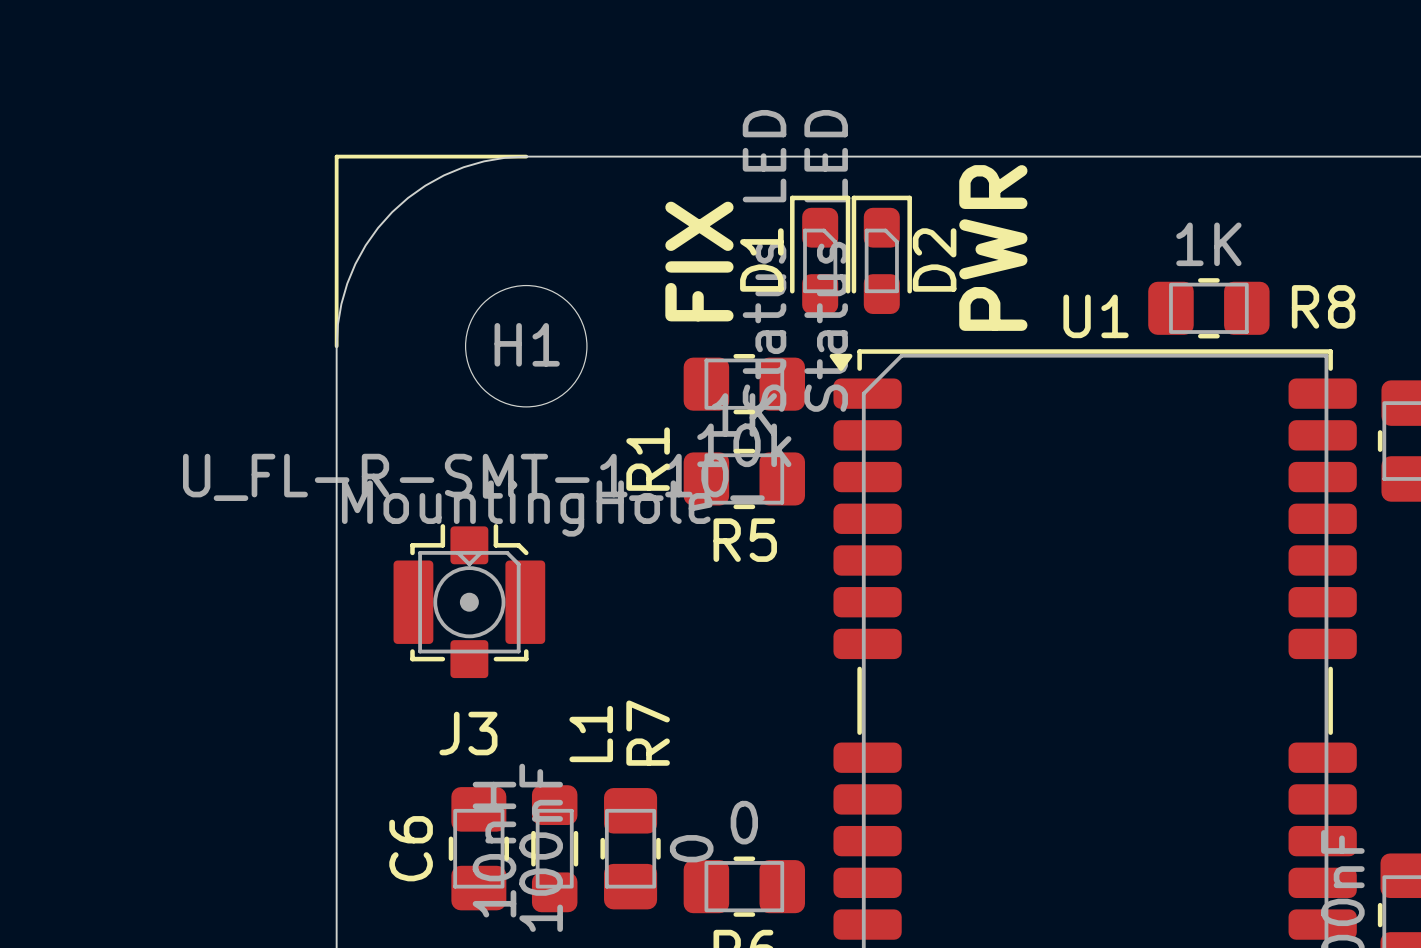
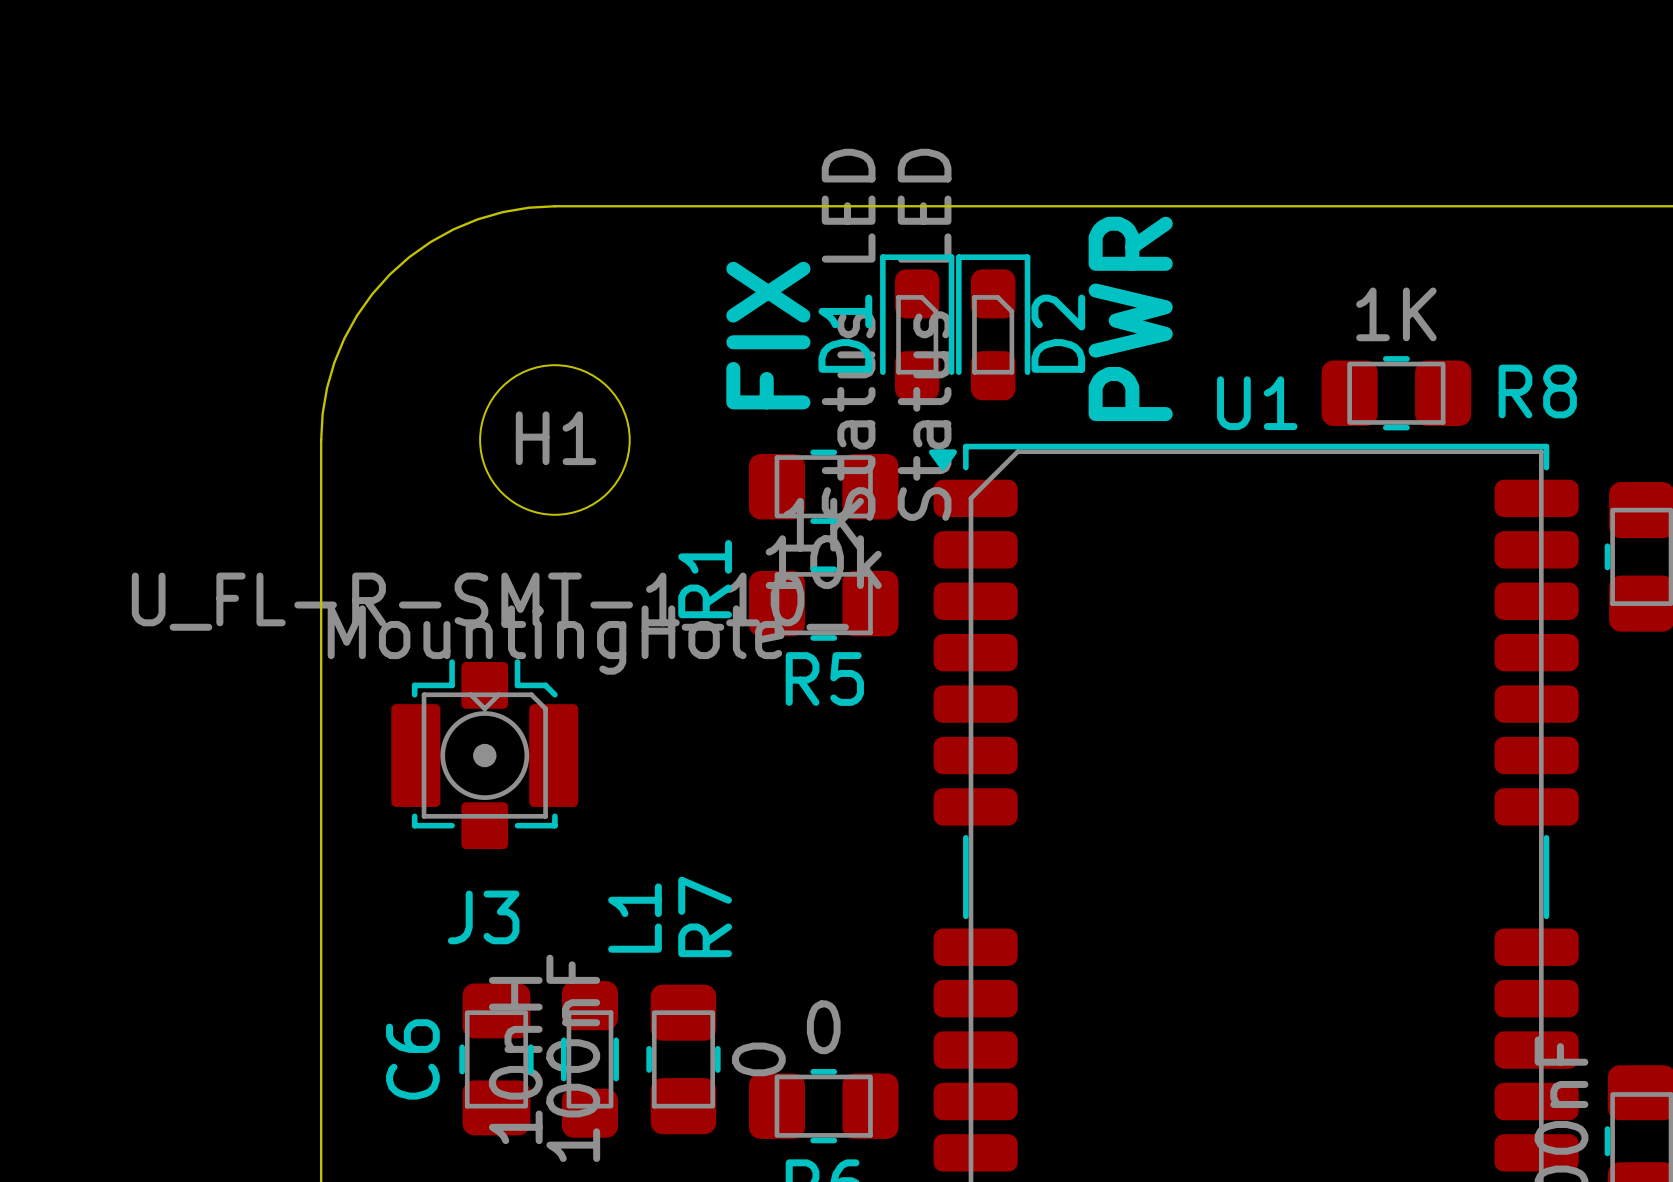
line: (526, 156) (336, 156) (336, 346) -> none

